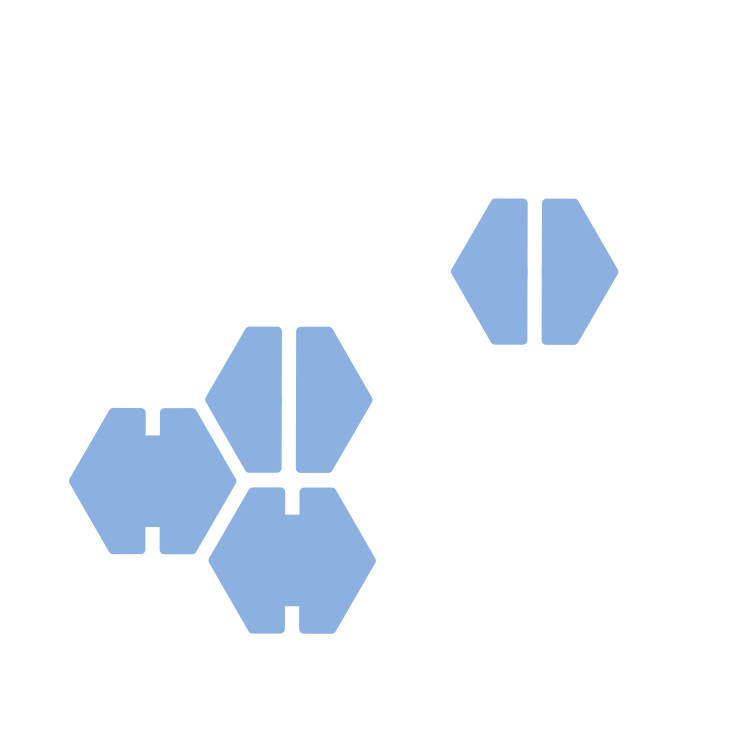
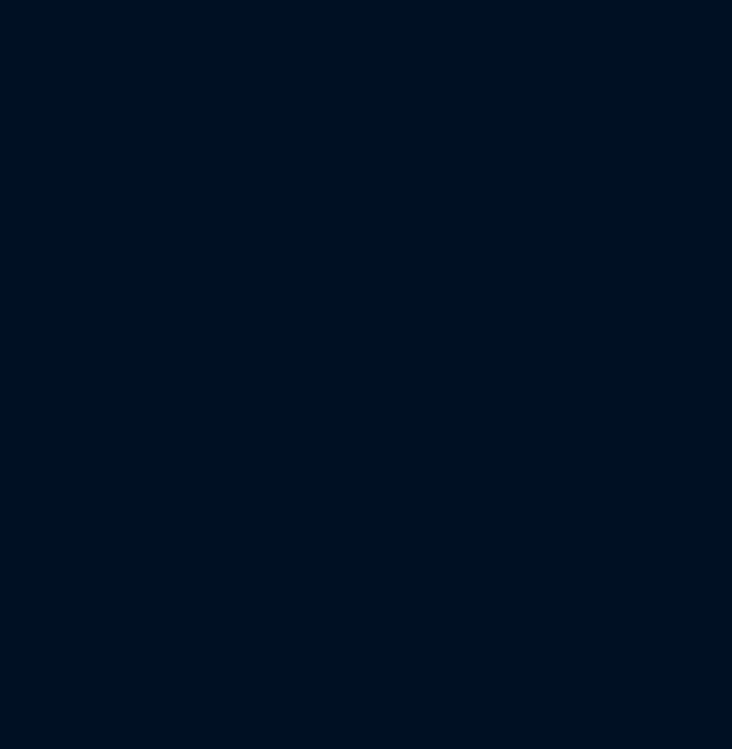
part: (534, 271) -> none
part: (288, 399) -> none
part: (152, 481) -> none
part: (292, 560) -> none

